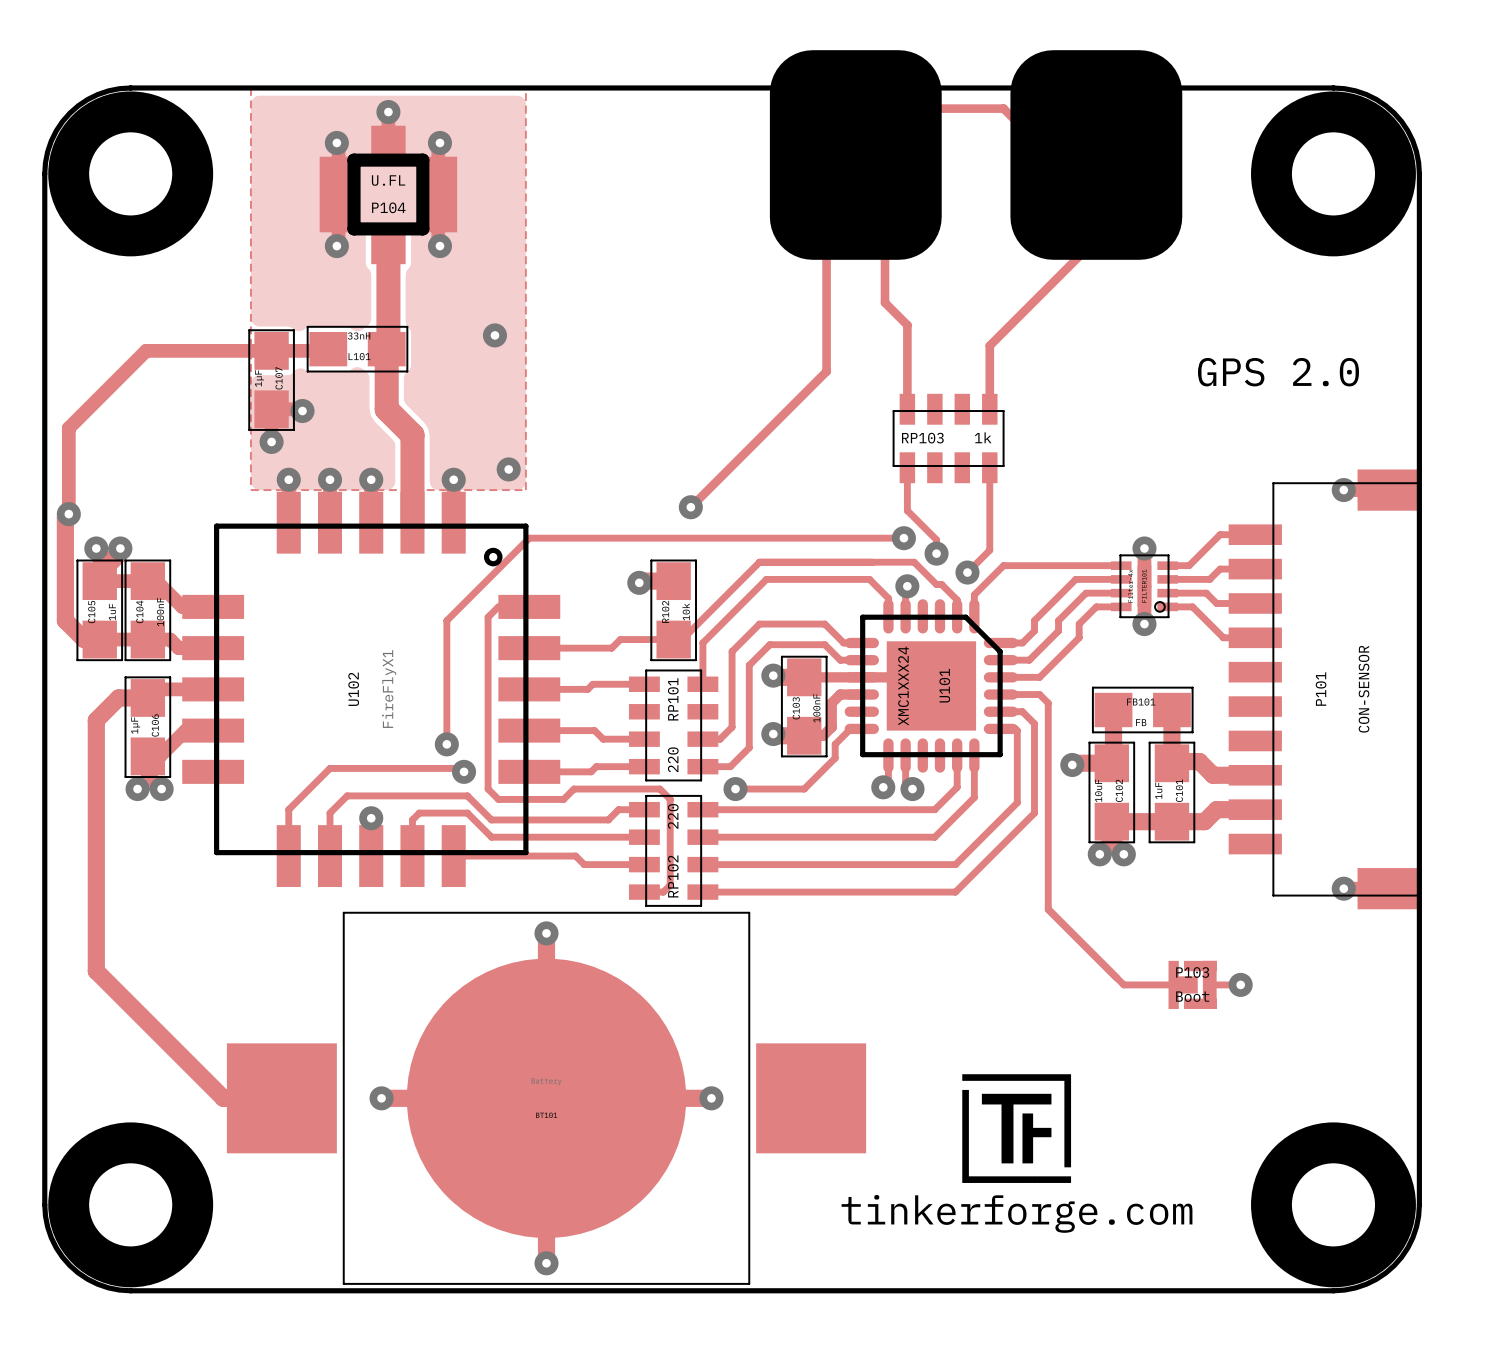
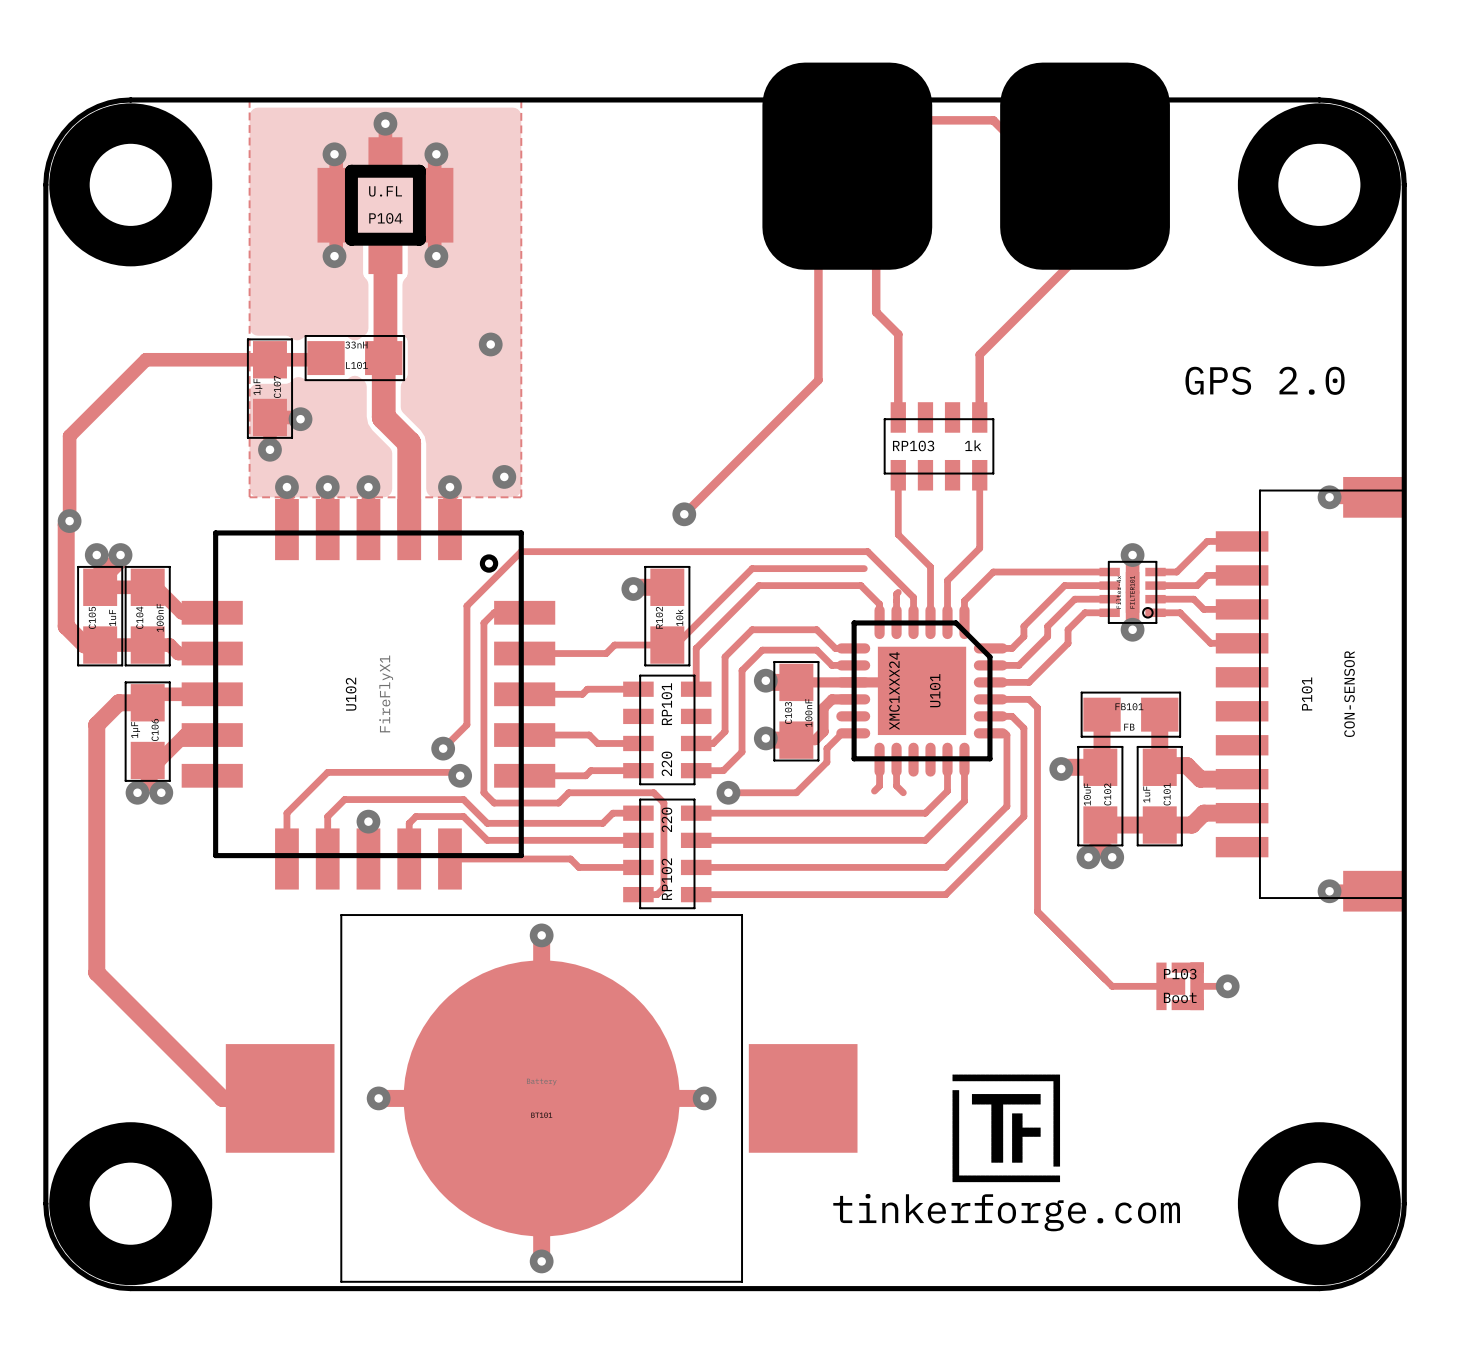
track: (907, 510) (936, 539) (936, 553) -> (898, 517) (898, 534) (930, 566) (930, 622)
track: (903, 538) (529, 538) (446, 620) (446, 744) -> (913, 622) (913, 597) (867, 551) (521, 551) (466, 605) (466, 724) (443, 748)
via: (903, 538) -> none
track: (989, 541) (989, 550) (967, 572) -> (979, 548) (947, 580) (947, 605)
via: (936, 553) -> none
track: (872, 562) (914, 562) (936, 584) (941, 584) (957, 600) -> none
via: (967, 572) -> none
via: (907, 586) -> none
via: (883, 787) -> none
via: (912, 789) -> none

